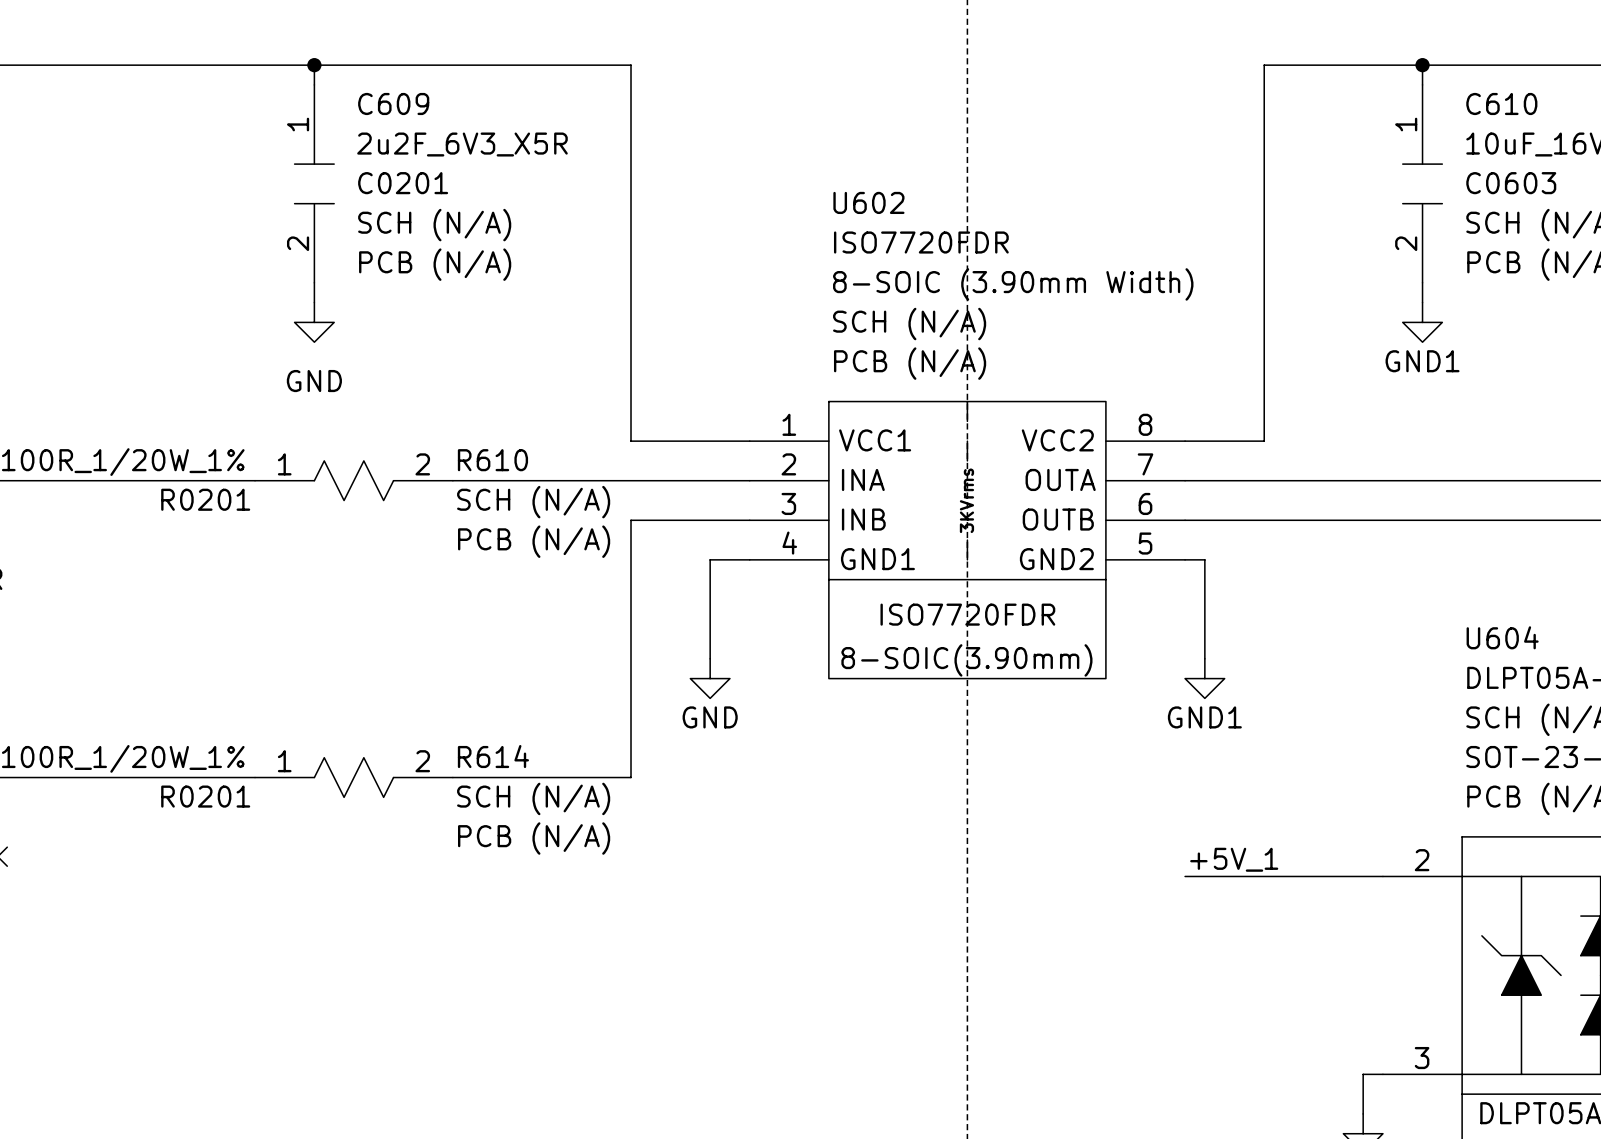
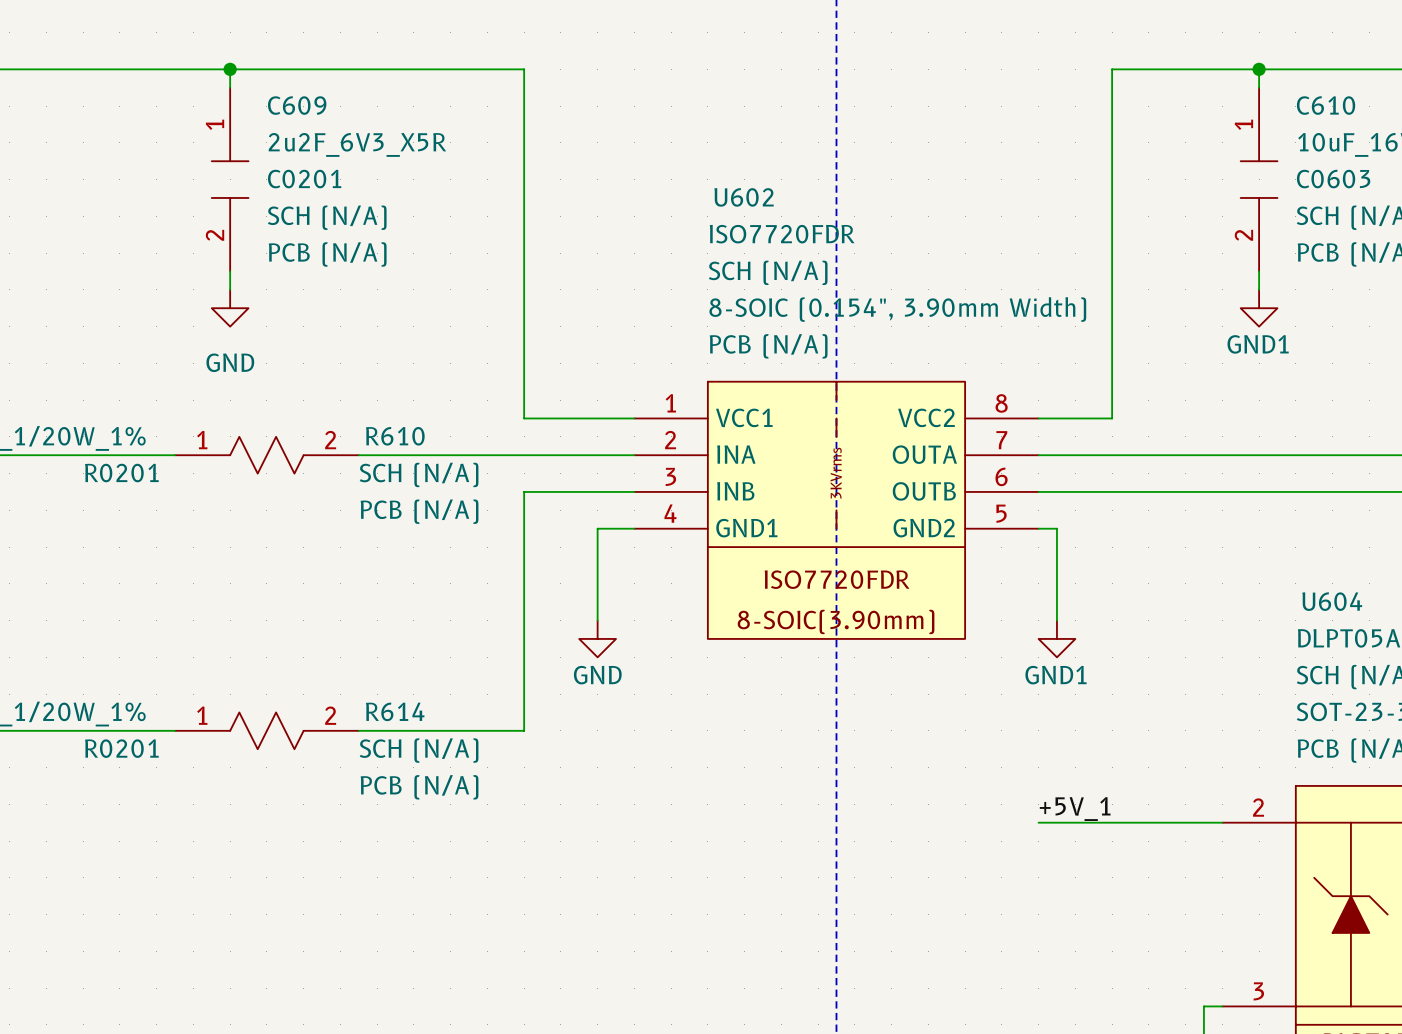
U602 text: 8-SOIC (3.90mm Width) (1013, 284) -> 8-SOIC (0.154", 3.90mm Width) (897, 309)
U602 text position: SCH (N/A) (909, 324) -> SCH (N/A) (768, 272)

